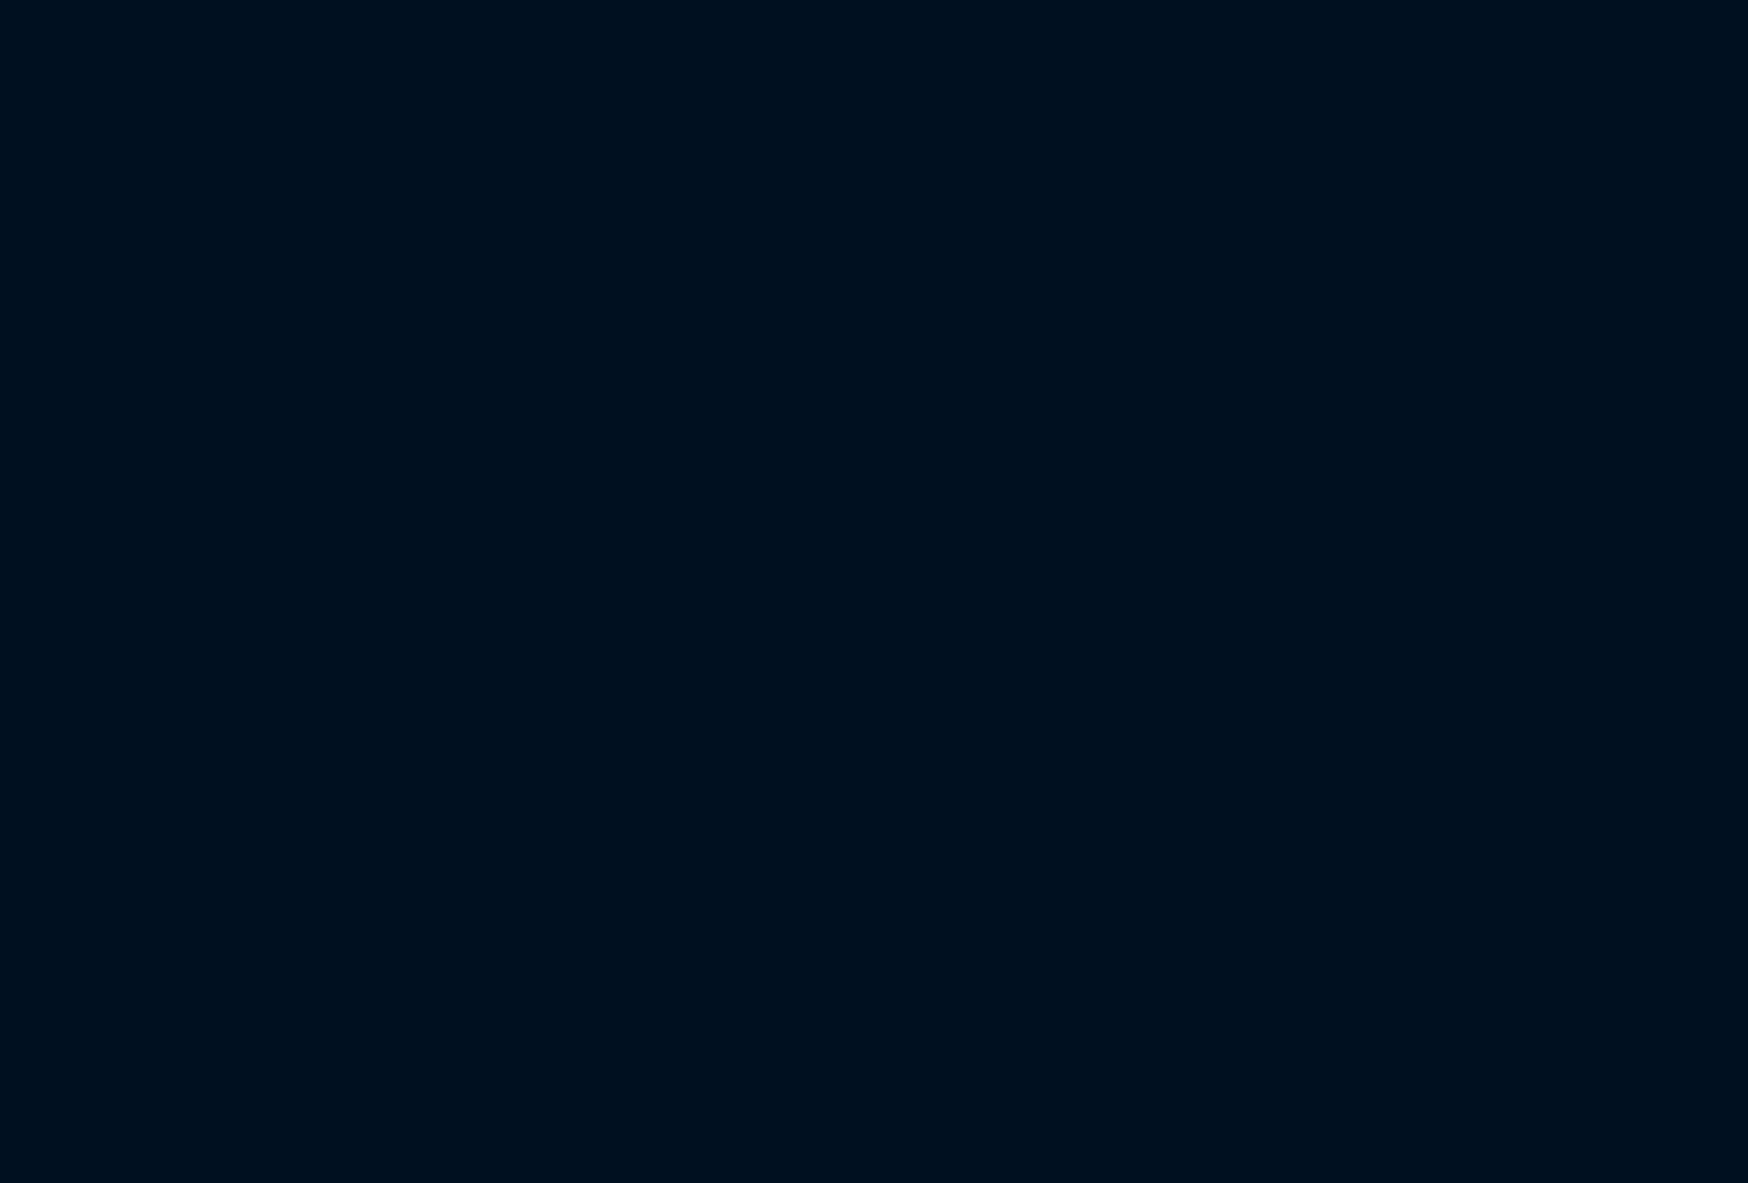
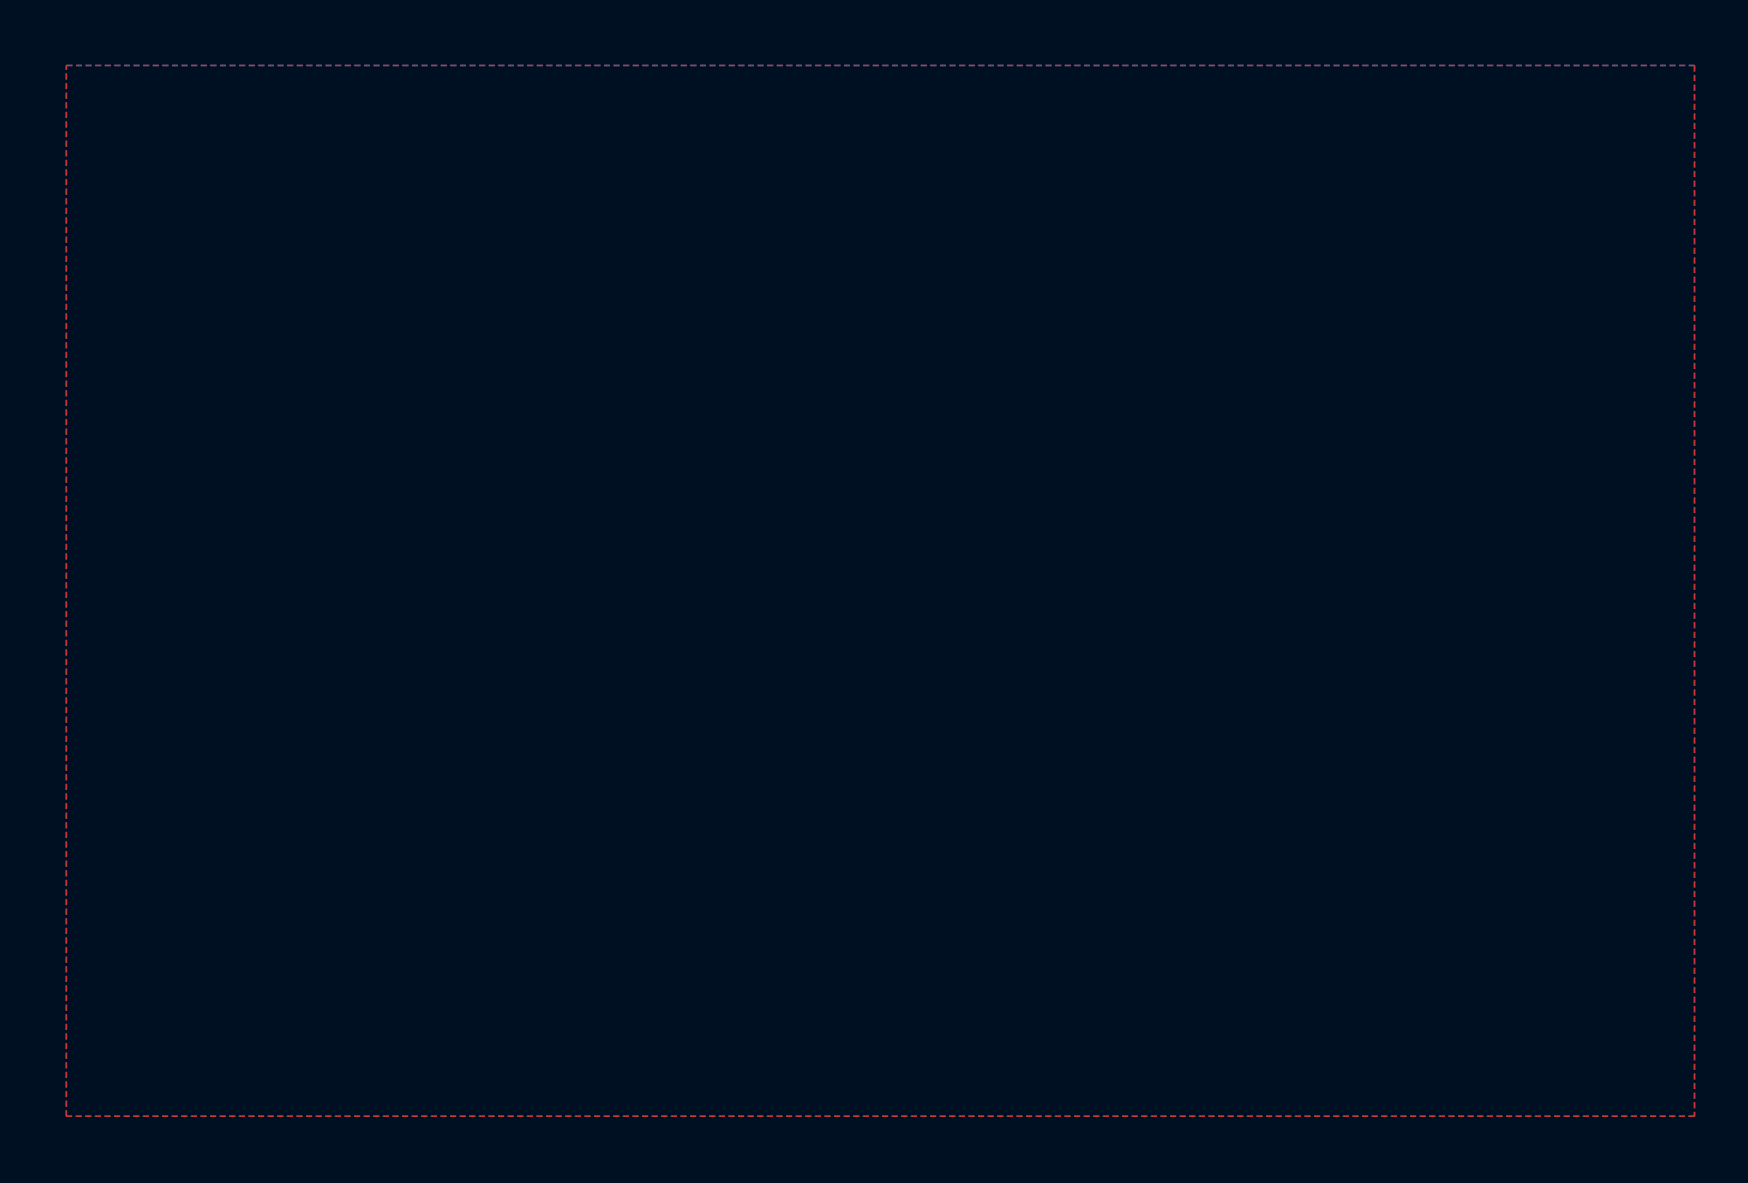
top zone outline: none -> (66, 65) (1694, 65) (1694, 1116) (66, 1116) (66, 65)

